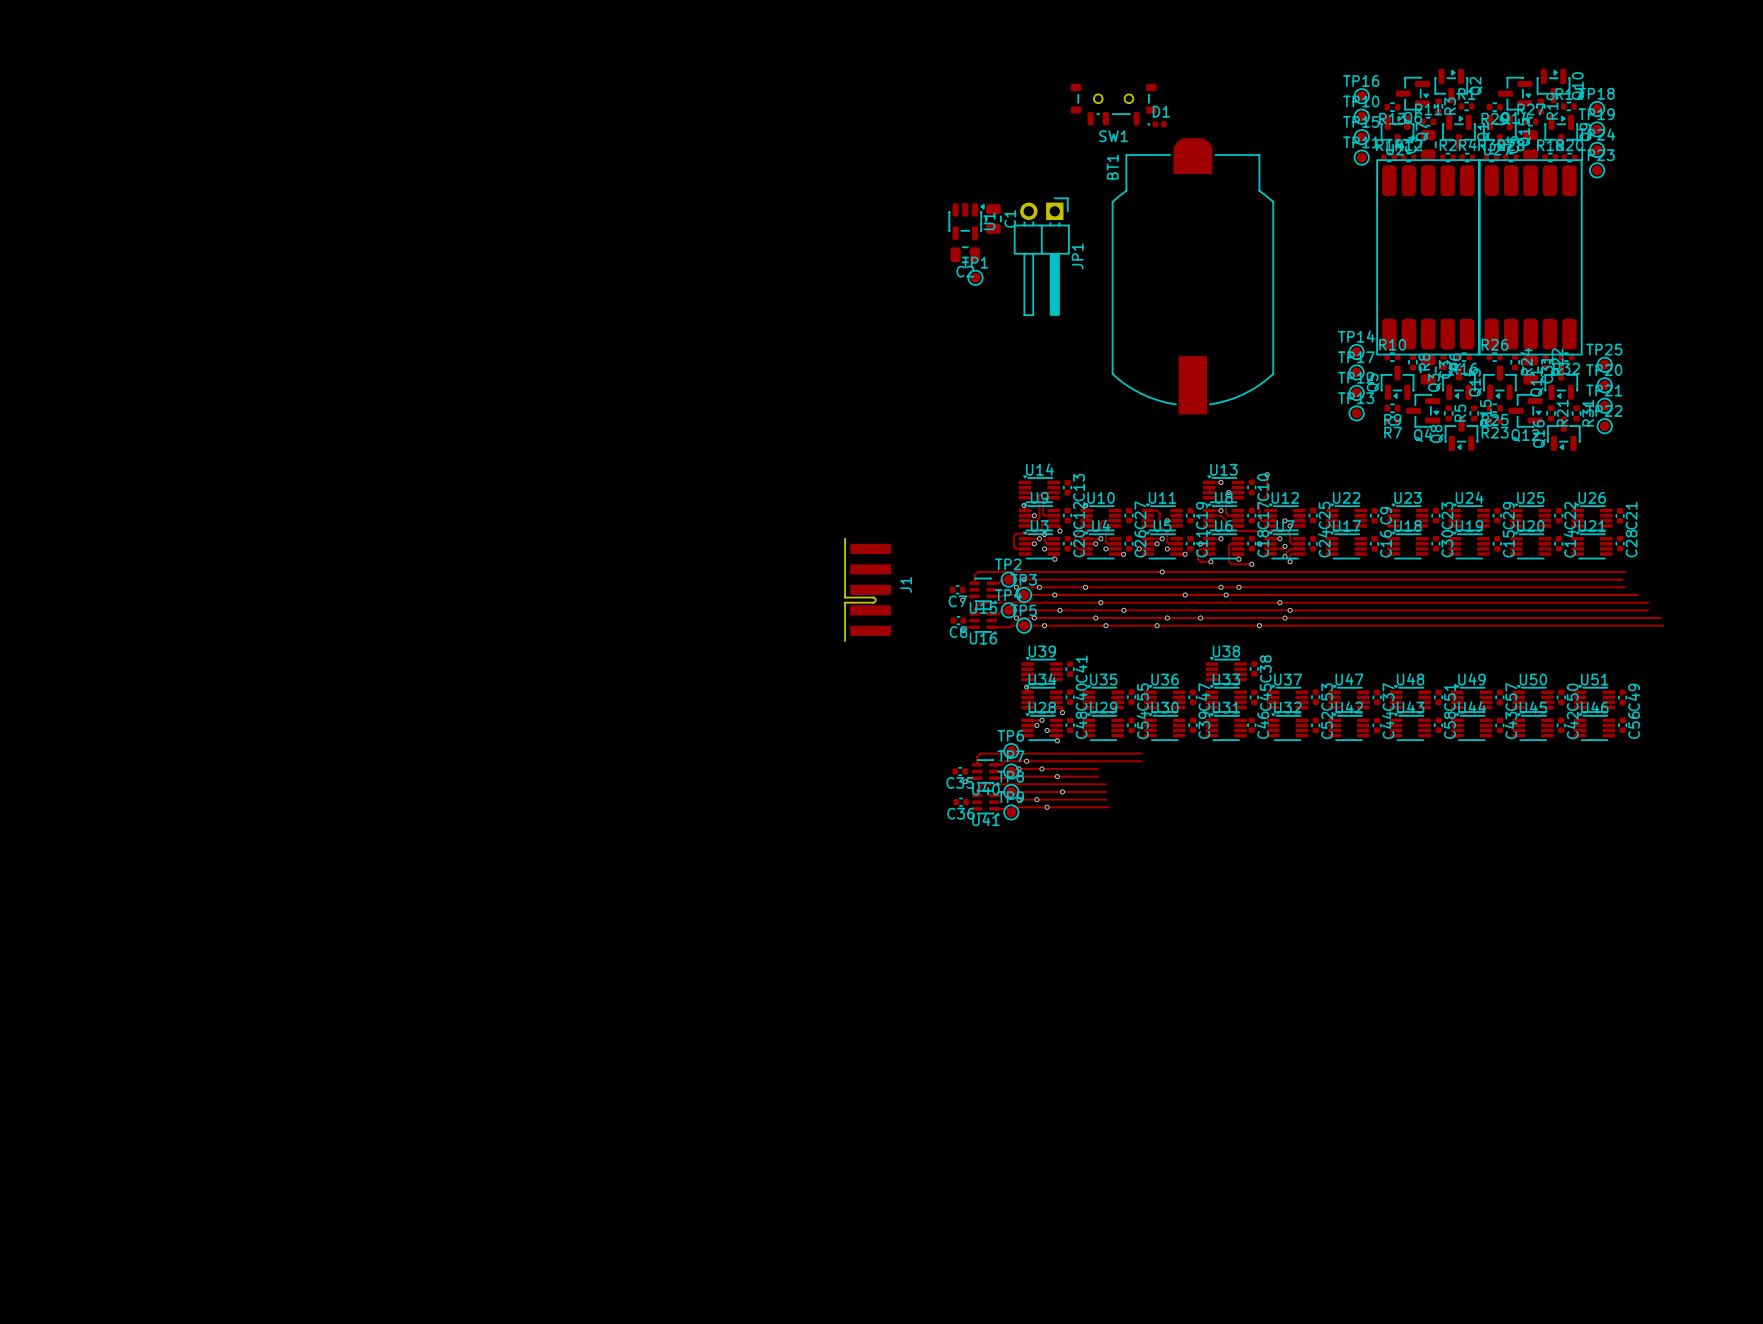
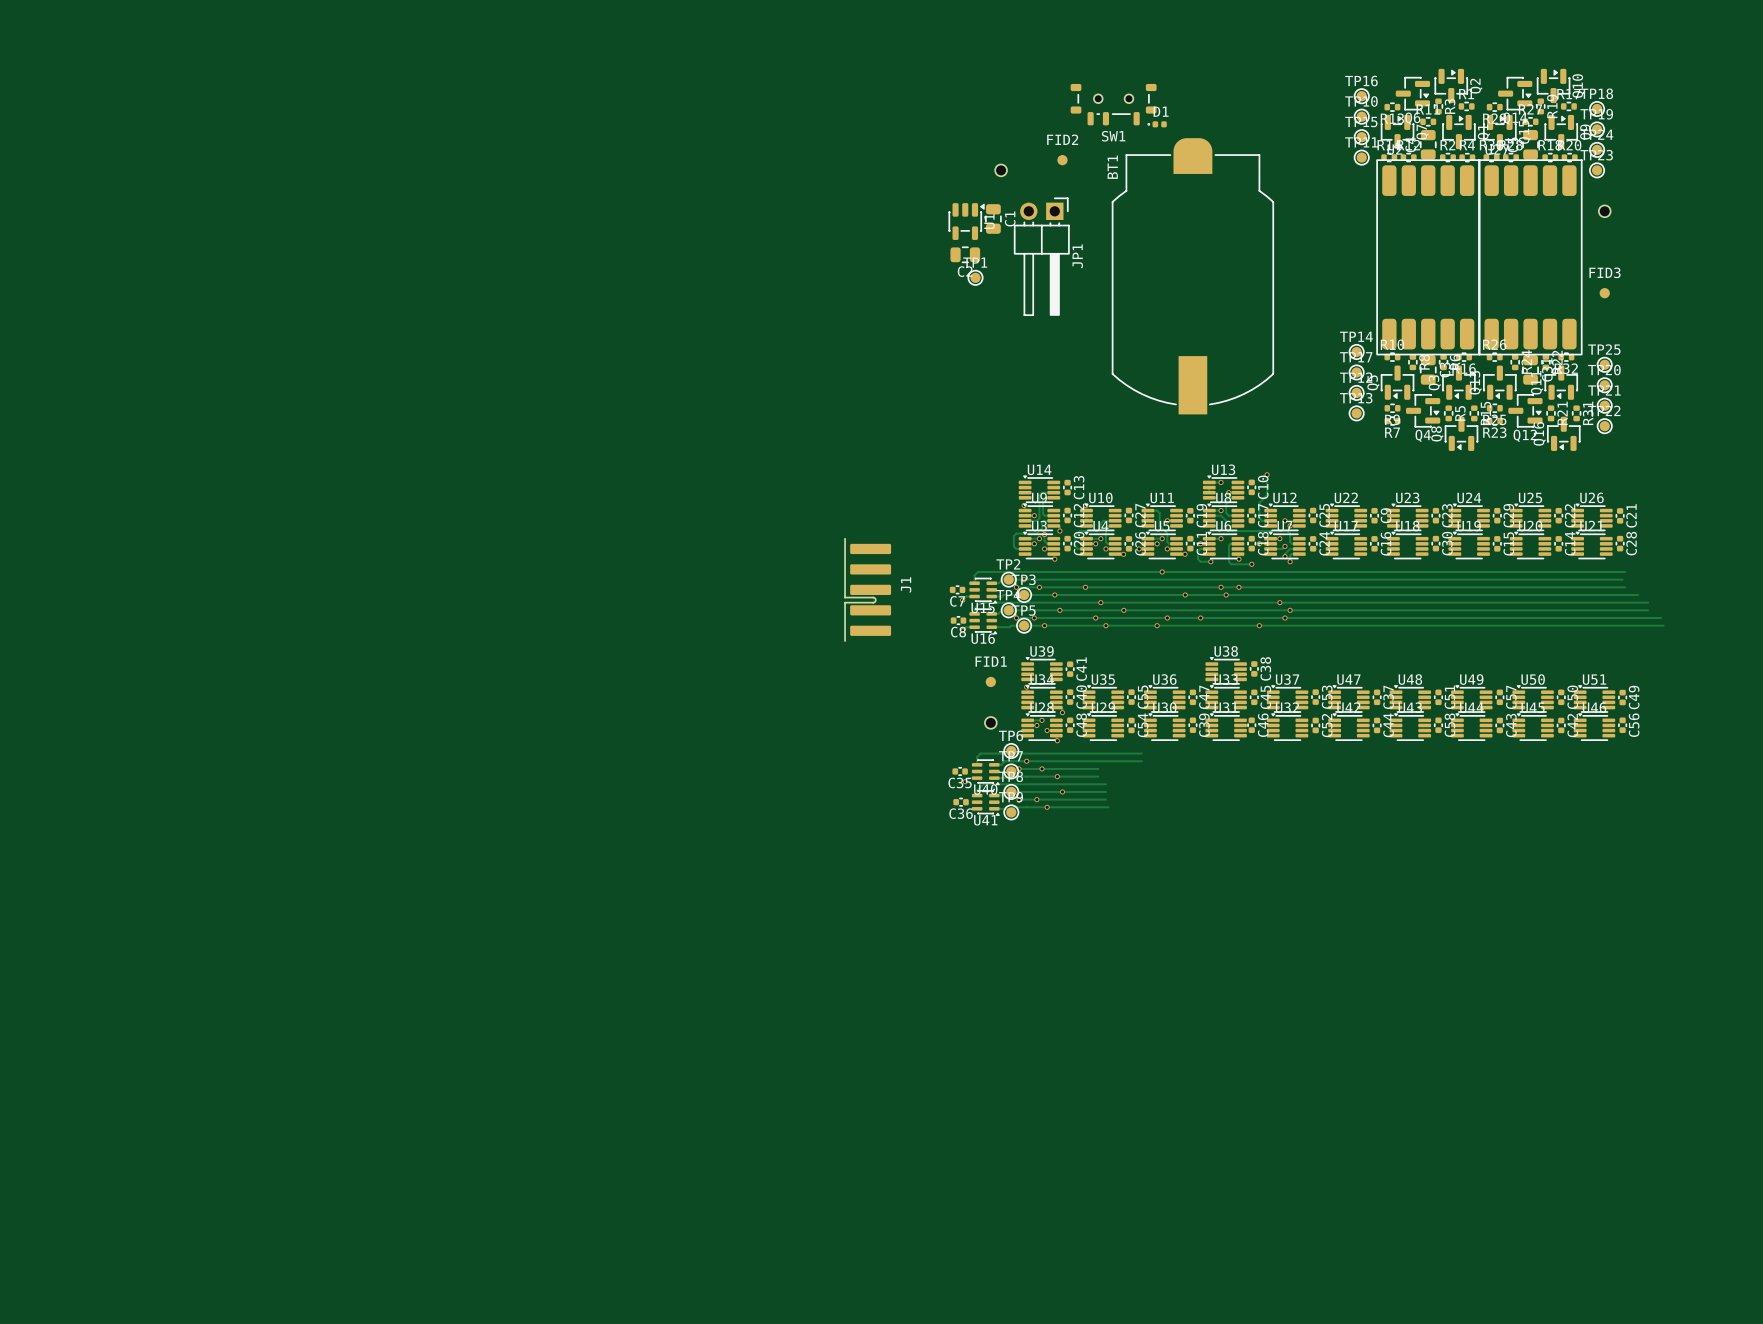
FID2: none -> (1062, 160)
part: none -> (1001, 170)
part: none -> (1604, 211)
FID3: none -> (1604, 293)
FID1: none -> (990, 681)
part: none -> (990, 722)

